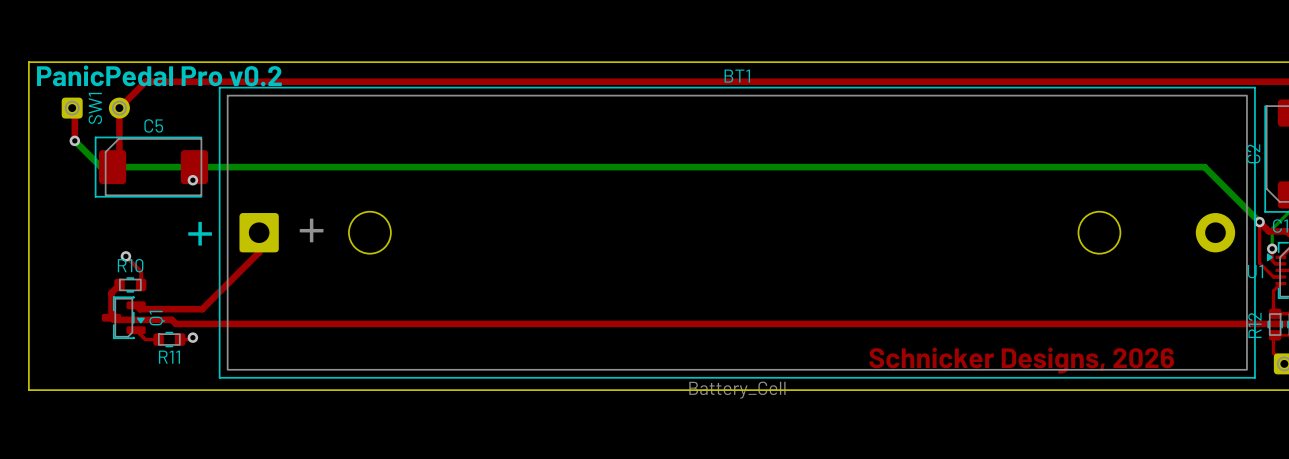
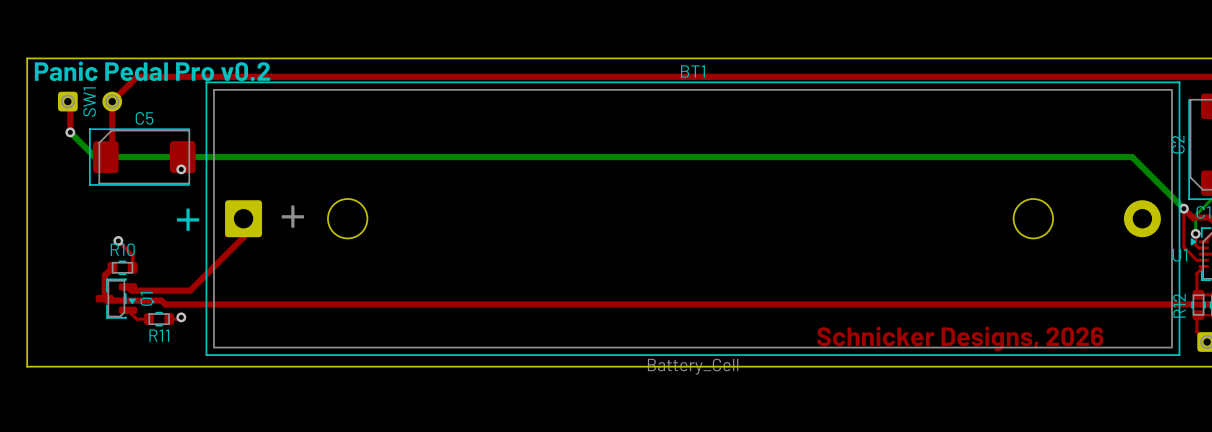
text: PanicPedal Pro v0.2 (159, 75) -> Panic Pedal Pro v0.2 (152, 71)

